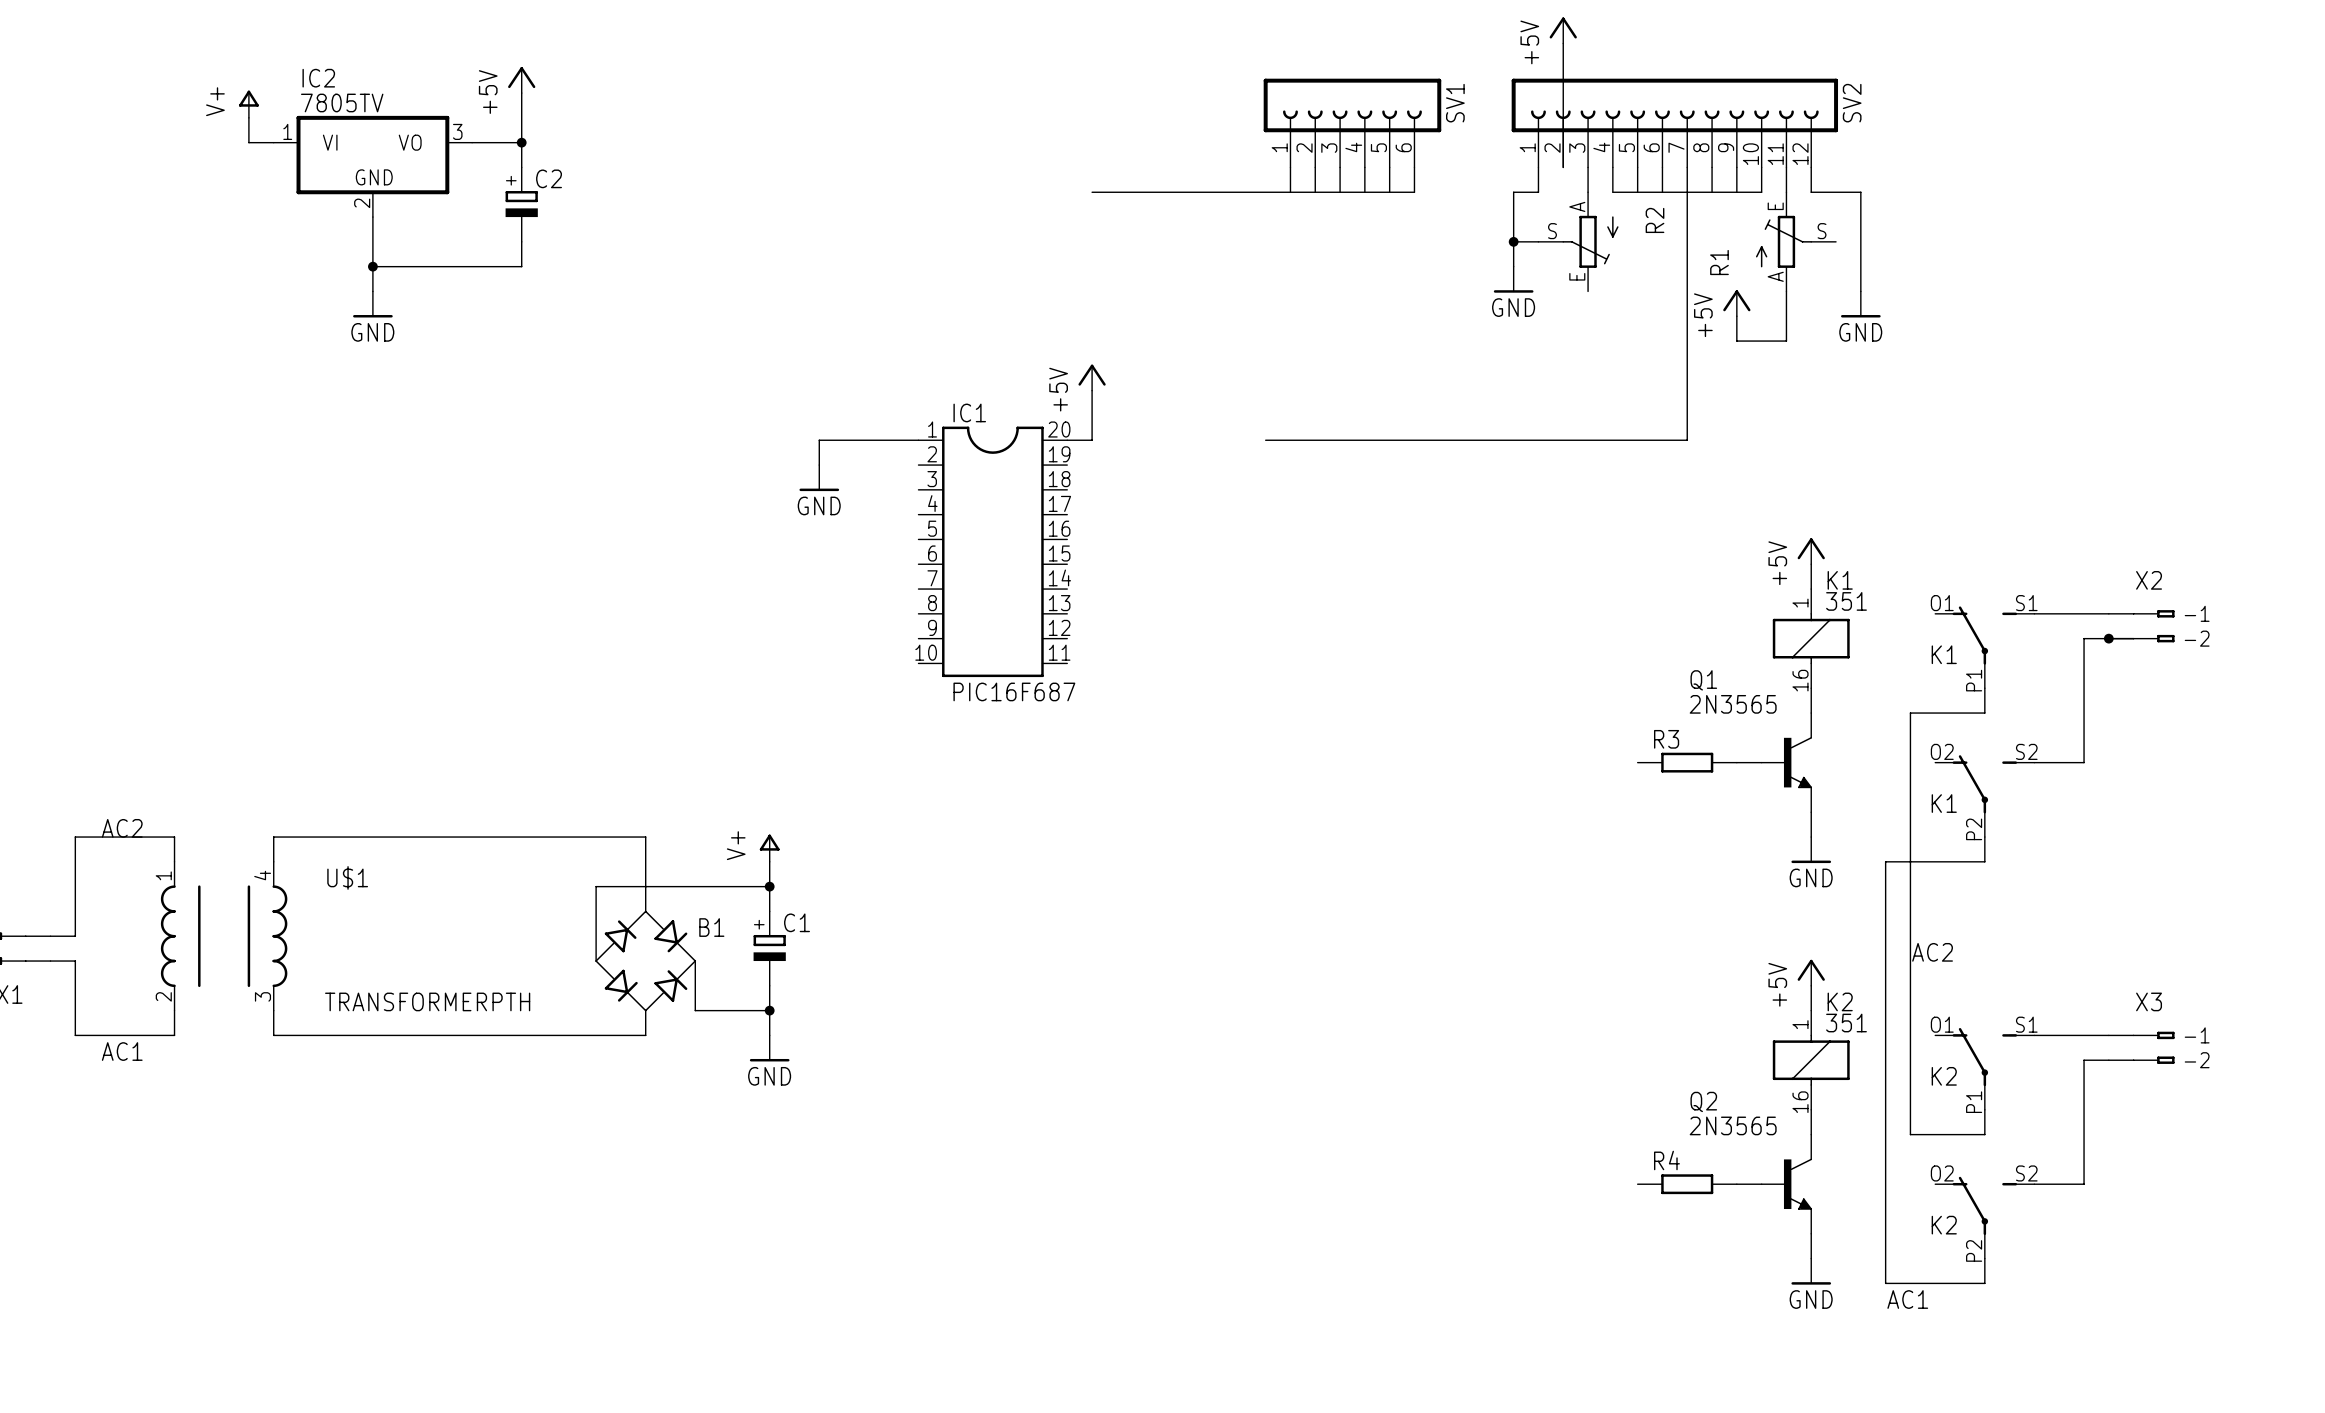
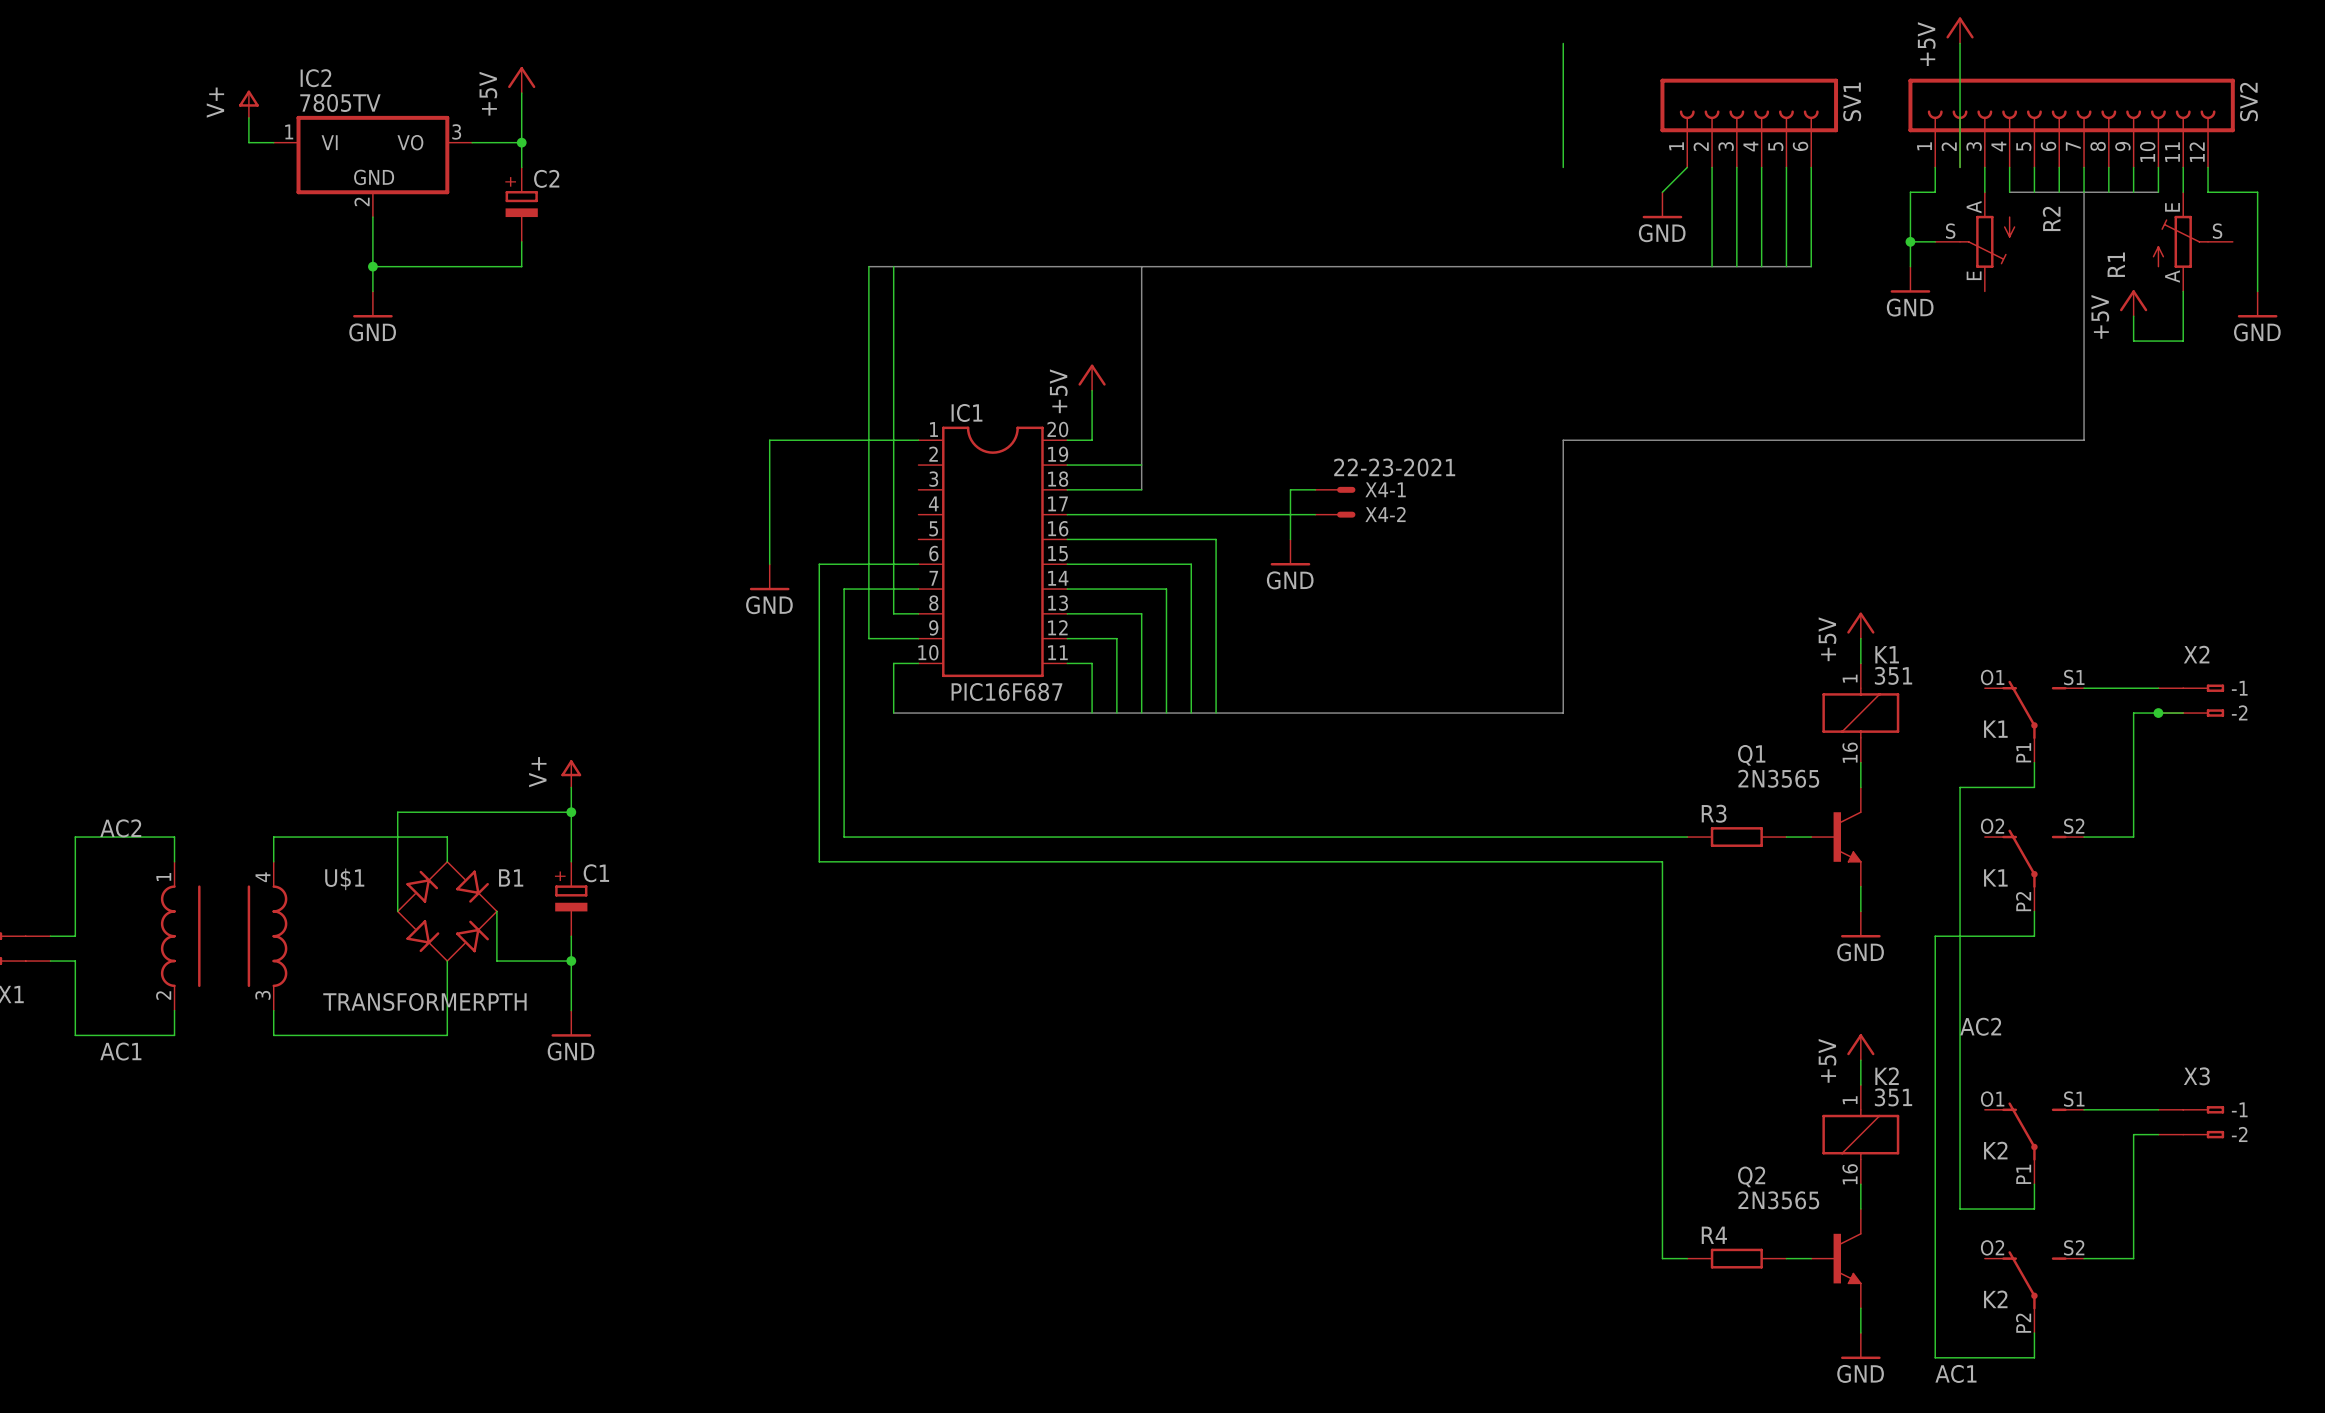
power symbol: +5V (1563, 30) -> none
power symbol: none -> +5V (1960, 30)
wire: none -> (1960, 43) (1960, 167)
SV1 position: (1352, 123) -> (1749, 123)
SV2 position: (1674, 123) -> (2071, 123)
wire: (1290, 167) (1290, 192) -> none
wire: (1315, 167) (1315, 192) -> none
wire: (1340, 167) (1340, 192) -> none
wire: (1364, 167) (1364, 192) -> none
wire: (1389, 167) (1389, 192) -> none
wire: (1414, 167) (1414, 192) -> none
wire: (1538, 167) (1538, 192) (1513, 192) (1513, 266) -> none
wire: (1588, 167) (1588, 192) -> none
wire: (1612, 167) (1612, 192) -> none
wire: (1637, 167) (1637, 192) -> none
wire: (1662, 167) (1662, 192) -> (1687, 167) (1662, 192)
wire: (1687, 167) (1687, 192) -> none
wire: none -> (1935, 167) (1935, 192) (1910, 192) (1910, 266)
wire: none -> (1984, 167) (1984, 192)
wire: none -> (2009, 167) (2009, 192)
wire: none -> (2034, 167) (2034, 192)
wire: none -> (2059, 167) (2059, 192)
wire: none -> (2084, 167) (2084, 192)
wire: none -> (2108, 167) (2108, 192)
wire: none -> (2133, 167) (2133, 192)
wire: none -> (2158, 167) (2158, 192)
wire: none -> (2183, 167) (2183, 192)
wire: none -> (2208, 167) (2208, 192) (2257, 192) (2257, 291)
bus: (1092, 192) (1414, 192) -> none
bus: (1612, 192) (1761, 192) -> none
bus: (1687, 192) (1687, 440) -> (2084, 192) (2084, 440) (1687, 440)
wire: none -> (1712, 192) (1712, 266)
wire: none -> (1736, 192) (1736, 266)
wire: none -> (1761, 192) (1761, 266)
wire: none -> (1786, 192) (1786, 266)
wire: (1811, 192) (1860, 192) (1860, 291) -> (1811, 192) (1811, 266)
bus: none -> (2009, 192) (2158, 192)
power symbol: none -> GND (1662, 205)
wire: (1513, 241) (1538, 241) -> none
junction: (1513, 241) -> none
R2 position: (1578, 241) -> (1975, 241)
R1 position: (1795, 241) -> (2192, 241)
wire: none -> (1910, 241) (1935, 241)
junction: none -> (1910, 241)
bus: none -> (868, 266) (1811, 266)
wire: none -> (868, 266) (868, 638) (918, 638)
wire: none -> (893, 266) (893, 613) (918, 613)
bus: none -> (1141, 266) (1141, 489)
power symbol: GND (1513, 279) -> none
wire: (1786, 291) (1786, 341) (1736, 341) (1736, 316) -> none
wire: none -> (2183, 291) (2183, 341) (2133, 341) (2133, 316)
power symbol: +5V (1736, 303) -> none
power symbol: none -> +5V (2133, 303)
power symbol position: GND (1860, 304) -> GND (1910, 279)
power symbol: none -> GND (2257, 304)
wire: (819, 440) (819, 465) -> (819, 440) (769, 440) (769, 564)
bus: (1265, 440) (1563, 440) -> (893, 713) (1563, 713) (1563, 440)
wire: none -> (1067, 465) (1141, 465)
power symbol position: GND (819, 478) -> GND (769, 577)
wire: none -> (1067, 489) (1141, 489)
wire: none -> (1315, 489) (1290, 489) (1290, 539)
X4-1: none -> 22-23-2021 (1335, 489)
wire: none -> (1067, 514) (1315, 514)
X4-2: none -> (1335, 514)
wire: none -> (1067, 539) (1216, 539) (1216, 713)
power symbol position: +5V (1811, 551) -> +5V (1860, 625)
power symbol: none -> GND (1290, 552)
wire: none -> (918, 564) (819, 564) (819, 861) (1662, 861) (1662, 1258) (1687, 1258)
wire: none -> (1067, 564) (1191, 564) (1191, 713)
wire: (1811, 564) (1811, 589) -> (1860, 638) (1860, 663)
wire: none -> (918, 589) (844, 589) (844, 837) (1687, 837)
wire: none -> (1067, 589) (1166, 589) (1166, 713)
wire: none -> (1067, 613) (1141, 613) (1141, 713)
wire: (2034, 613) (2108, 613) -> (2084, 688) (2158, 688)
X2 position: (2141, 626) -> (2191, 700)
wire: none -> (1067, 638) (1116, 638) (1116, 713)
K1 position: (1811, 638) -> (1860, 713)
junction: (2108, 638) -> none
wire: (2133, 638) (2084, 638) (2084, 762) (2034, 762) -> (2183, 713) (2133, 713) (2133, 837) (2084, 837)
K1 position: (1984, 647) -> (2034, 721)
wire: none -> (918, 663) (893, 663) (893, 713)
wire: none -> (1067, 663) (1092, 663) (1092, 713)
wire: (1811, 688) (1811, 713) -> (1860, 762) (1860, 787)
wire: (1984, 688) (1984, 713) (1910, 713) (1910, 1134) (1984, 1134) (1984, 1109) -> none
junction: none -> (2158, 713)
R3 position: (1687, 762) -> (1736, 837)
wire: (1736, 762) (1761, 762) -> none
Q1 position: (1786, 762) -> (1836, 837)
wire: none -> (571, 787) (571, 861)
K1 position: (1984, 796) -> (2034, 870)
wire: none -> (571, 812) (397, 812) (397, 911)
junction: none -> (571, 812)
wire: (1811, 812) (1811, 837) -> (1786, 837) (1811, 837)
wire: (447, 837) (645, 837) (645, 911) -> (447, 837) (447, 861)
wire: (1984, 837) (1984, 861) (1885, 861) (1885, 1283) (1984, 1283) (1984, 1258) -> (2034, 911) (2034, 936) (1935, 936) (1935, 1357) (2034, 1357) (2034, 1333)
power symbol position: V+ (769, 848) -> V+ (571, 773)
power symbol position: GND (1811, 850) -> GND (1860, 924)
wire: (769, 861) (769, 911) -> none
wire: (769, 886) (596, 886) (596, 961) -> none
junction: (769, 886) -> none
wire: none -> (1860, 886) (1860, 911)
wire: none -> (571, 936) (571, 1010)
C1 position: (769, 948) -> (571, 899)
label position: AC2 (1932, 952) -> AC2 (1980, 1026)
junction: none -> (571, 961)
B1 position: (645, 961) -> (447, 911)
wire: (695, 961) (695, 1010) (769, 1010) -> (496, 911) (496, 961) (571, 961)
power symbol position: +5V (1811, 972) -> +5V (1860, 1047)
wire: (769, 985) (769, 1035) -> none
wire: (1811, 985) (1811, 1010) -> (1860, 1060) (1860, 1085)
wire: (645, 1010) (645, 1035) (447, 1035) -> (447, 961) (447, 1035)
junction: (769, 1010) -> none
wire: (2034, 1035) (2108, 1035) -> (2084, 1109) (2158, 1109)
X3 position: (2141, 1047) -> (2191, 1122)
power symbol position: GND (769, 1048) -> GND (571, 1023)
K2 position: (1811, 1060) -> (1860, 1134)
wire: (2108, 1060) (2084, 1060) (2084, 1184) (2034, 1184) -> (2034, 762) (2034, 787) (1960, 787) (1960, 1209) (2034, 1209) (2034, 1184)
K2 position: (1984, 1068) -> (2034, 1143)
wire: (1811, 1109) (1811, 1134) -> (1860, 1184) (1860, 1209)
wire: none -> (2158, 1134) (2133, 1134) (2133, 1258) (2084, 1258)
R4 position: (1687, 1184) -> (1736, 1258)
wire: (1736, 1184) (1761, 1184) -> none
Q2 position: (1786, 1184) -> (1836, 1258)
K2 position: (1984, 1217) -> (2034, 1292)
wire: (1811, 1233) (1811, 1258) -> (1786, 1258) (1811, 1258)
power symbol position: GND (1811, 1271) -> GND (1860, 1346)
label position: AC1 (1907, 1299) -> AC1 (1955, 1373)
wire: none -> (1860, 1308) (1860, 1333)

